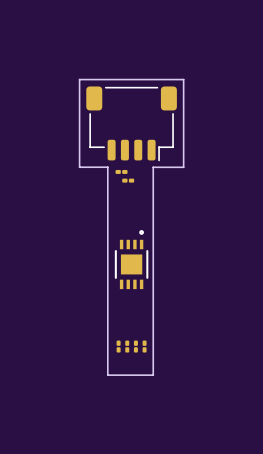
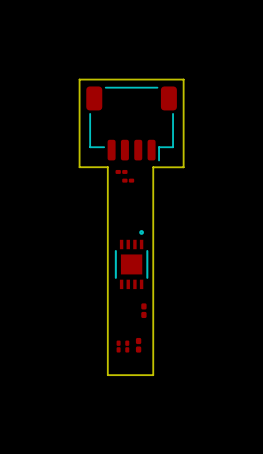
part: none -> (143, 310)
part: none -> (138, 345)
part: (135, 346) -> none
part: (144, 346) -> none

